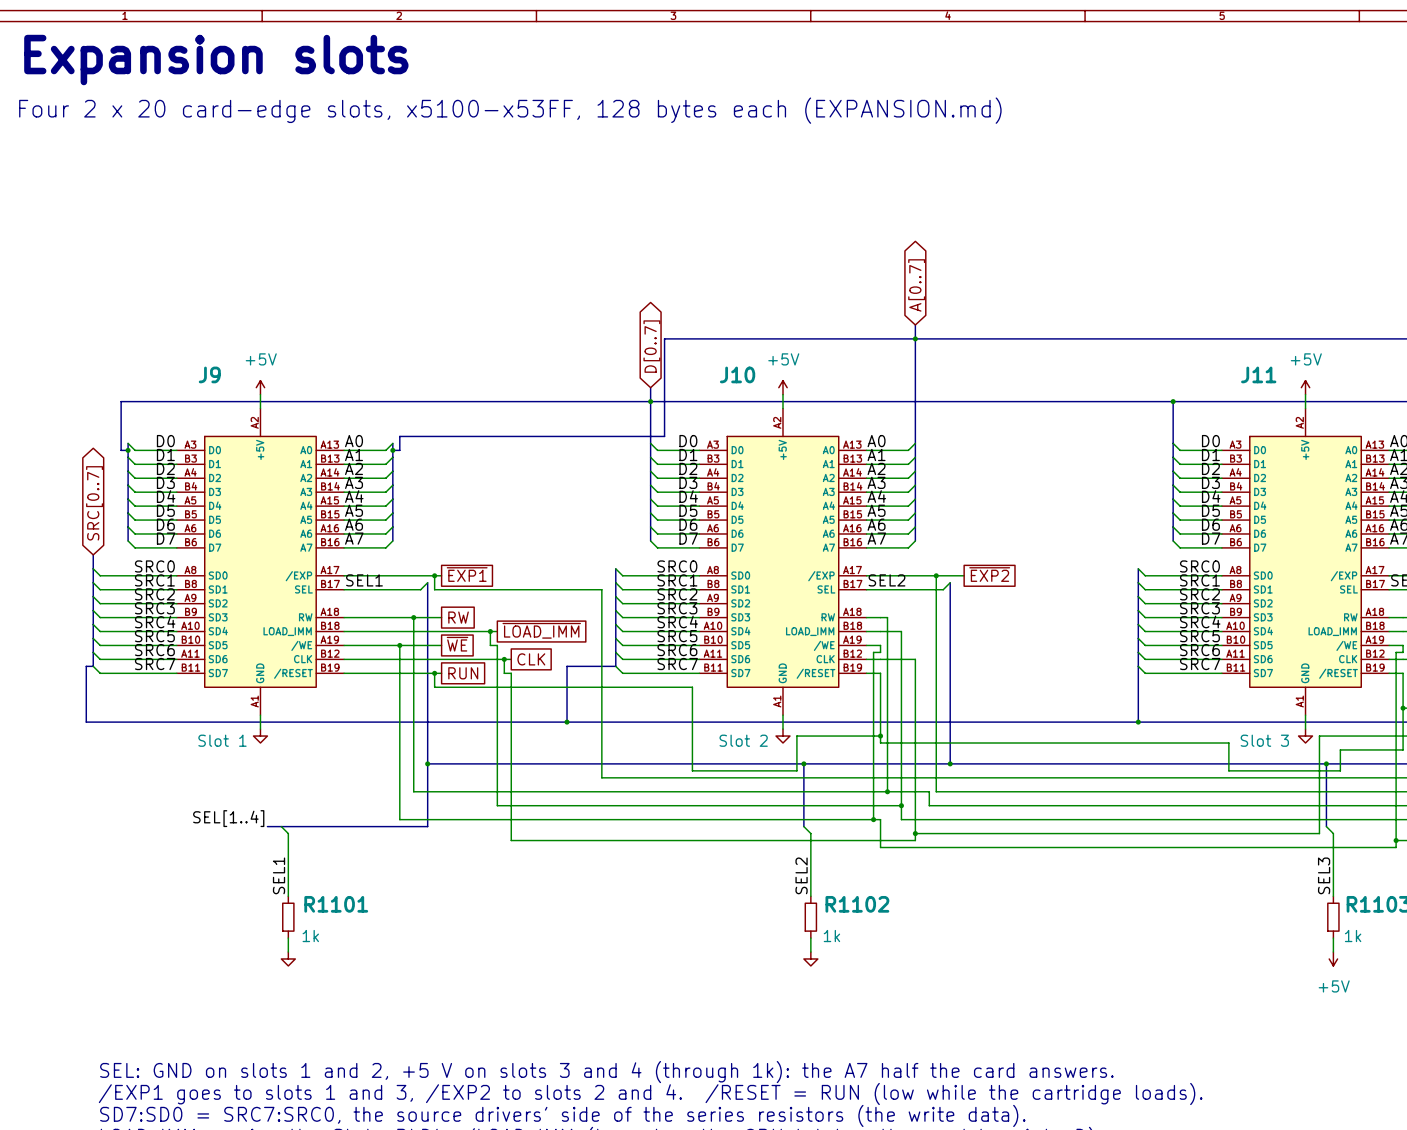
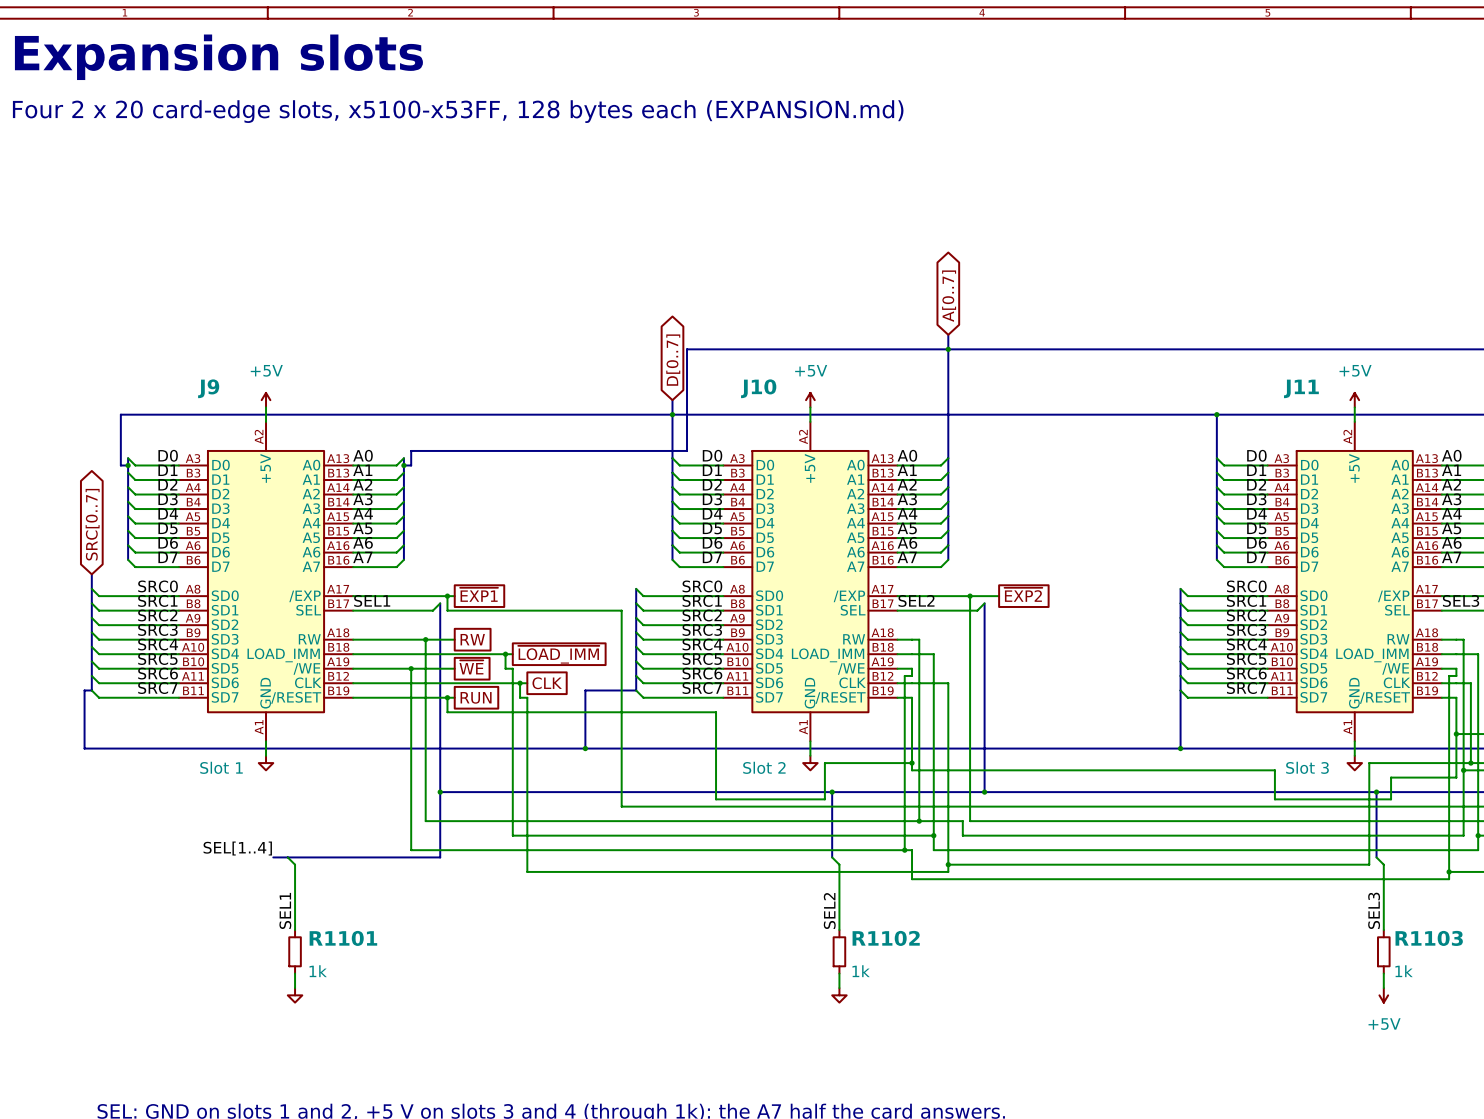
J9 symbol: [176, 408, 345, 716] -> [178, 421, 354, 742]
J10 symbol: [699, 408, 867, 716] -> [723, 421, 898, 742]
J11 symbol: [1221, 408, 1390, 716] -> [1267, 421, 1442, 742]

